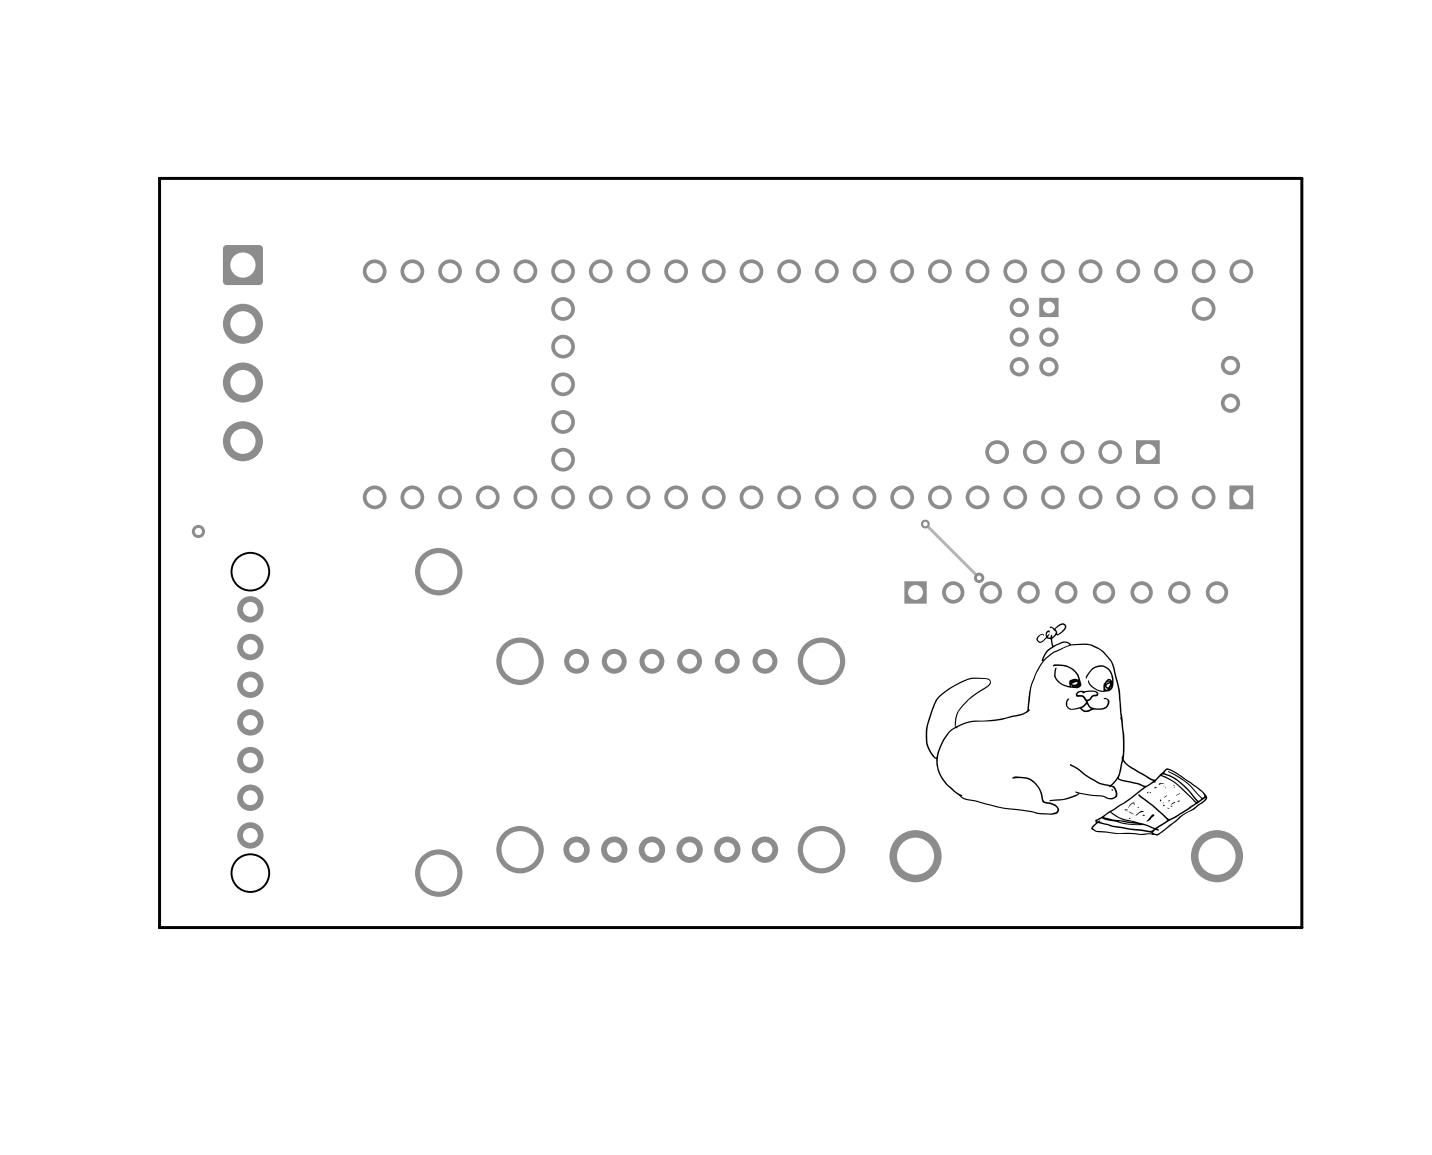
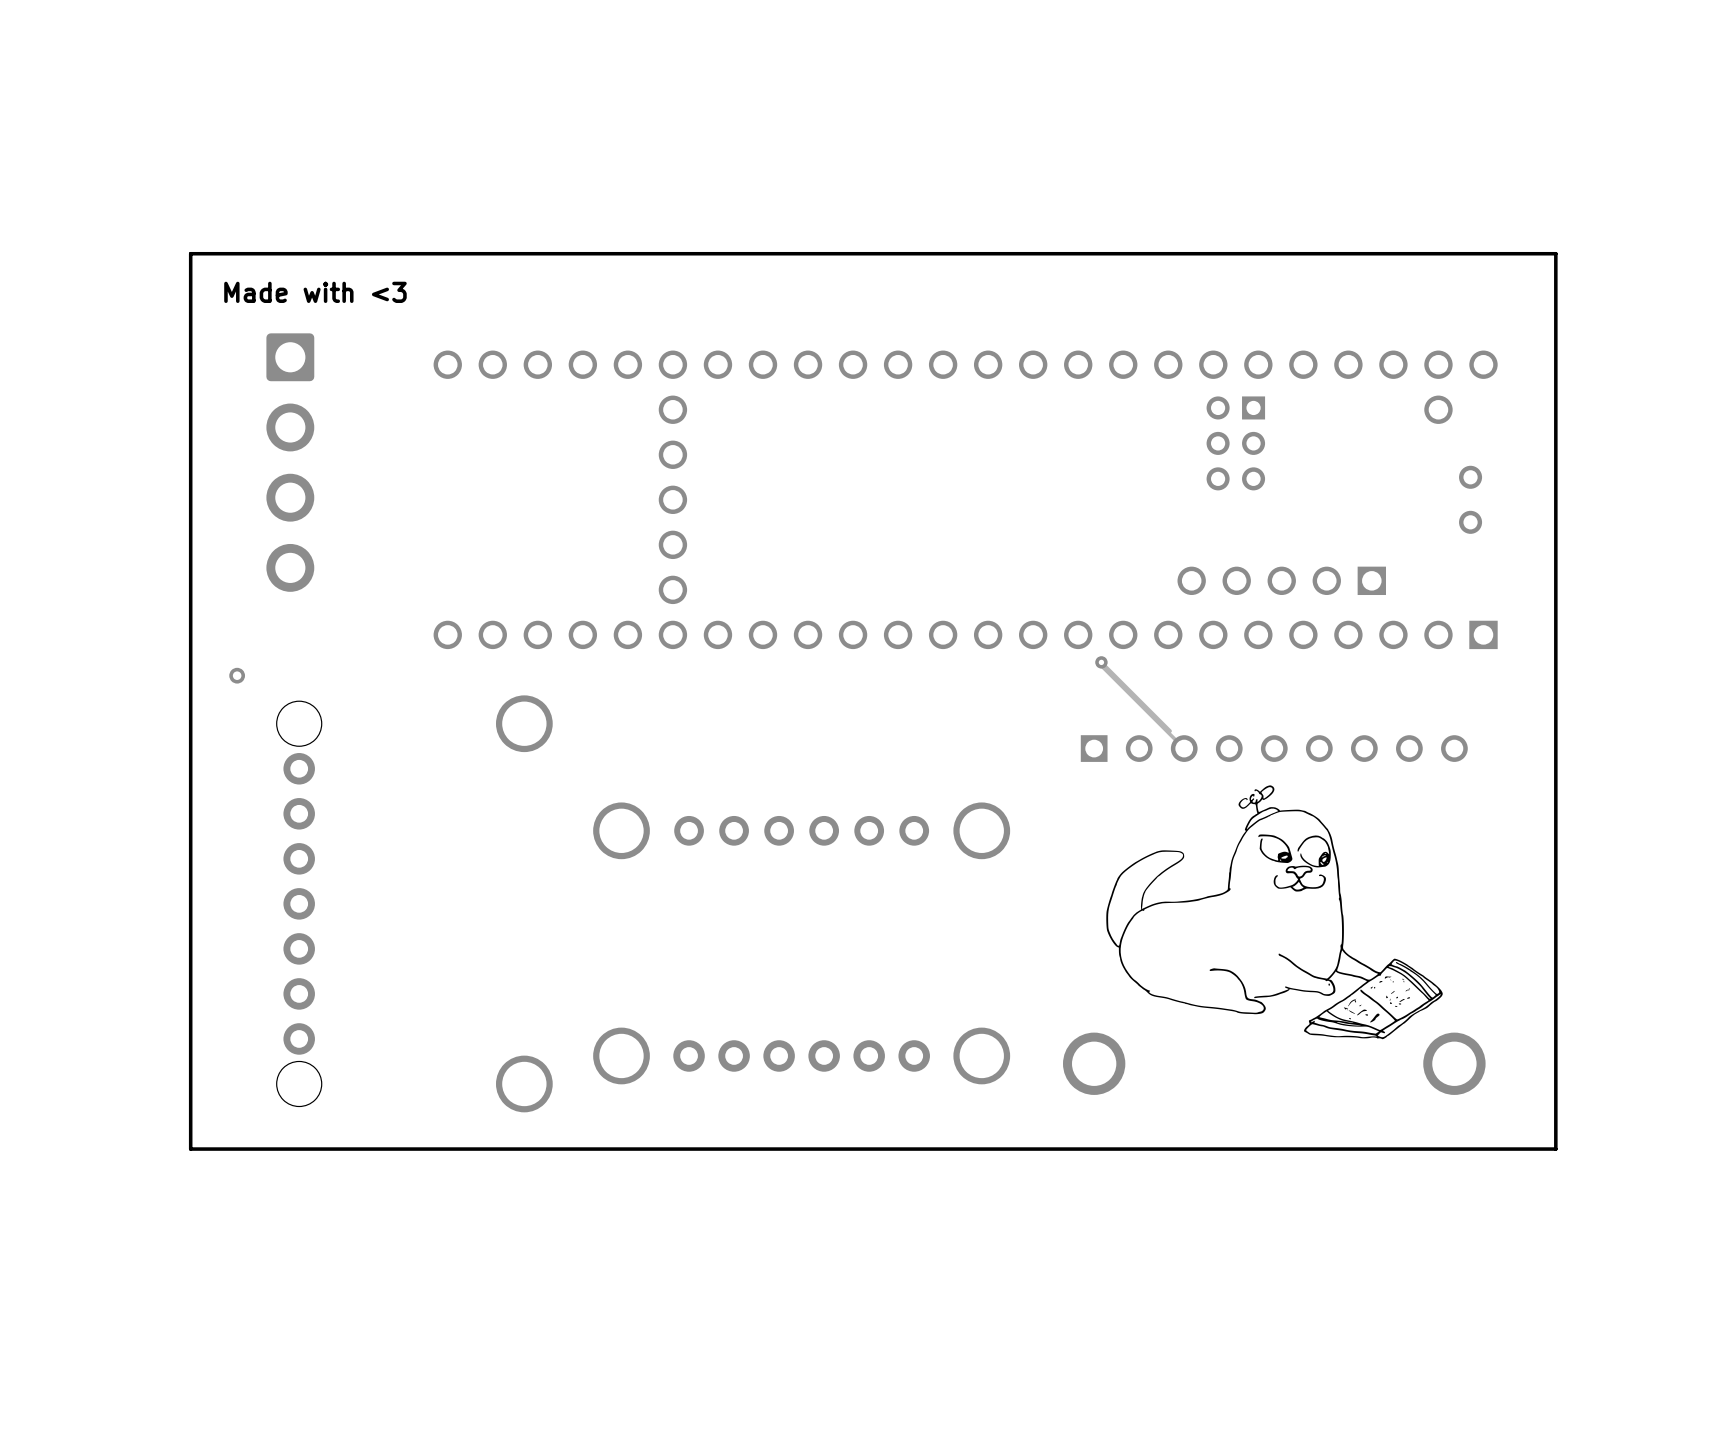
text: none -> Made with <3 (315, 292)
track: none -> (1101, 662) (1101, 665) (1184, 748)
via: (925, 524) -> none
via position: (979, 577) -> (1101, 662)

